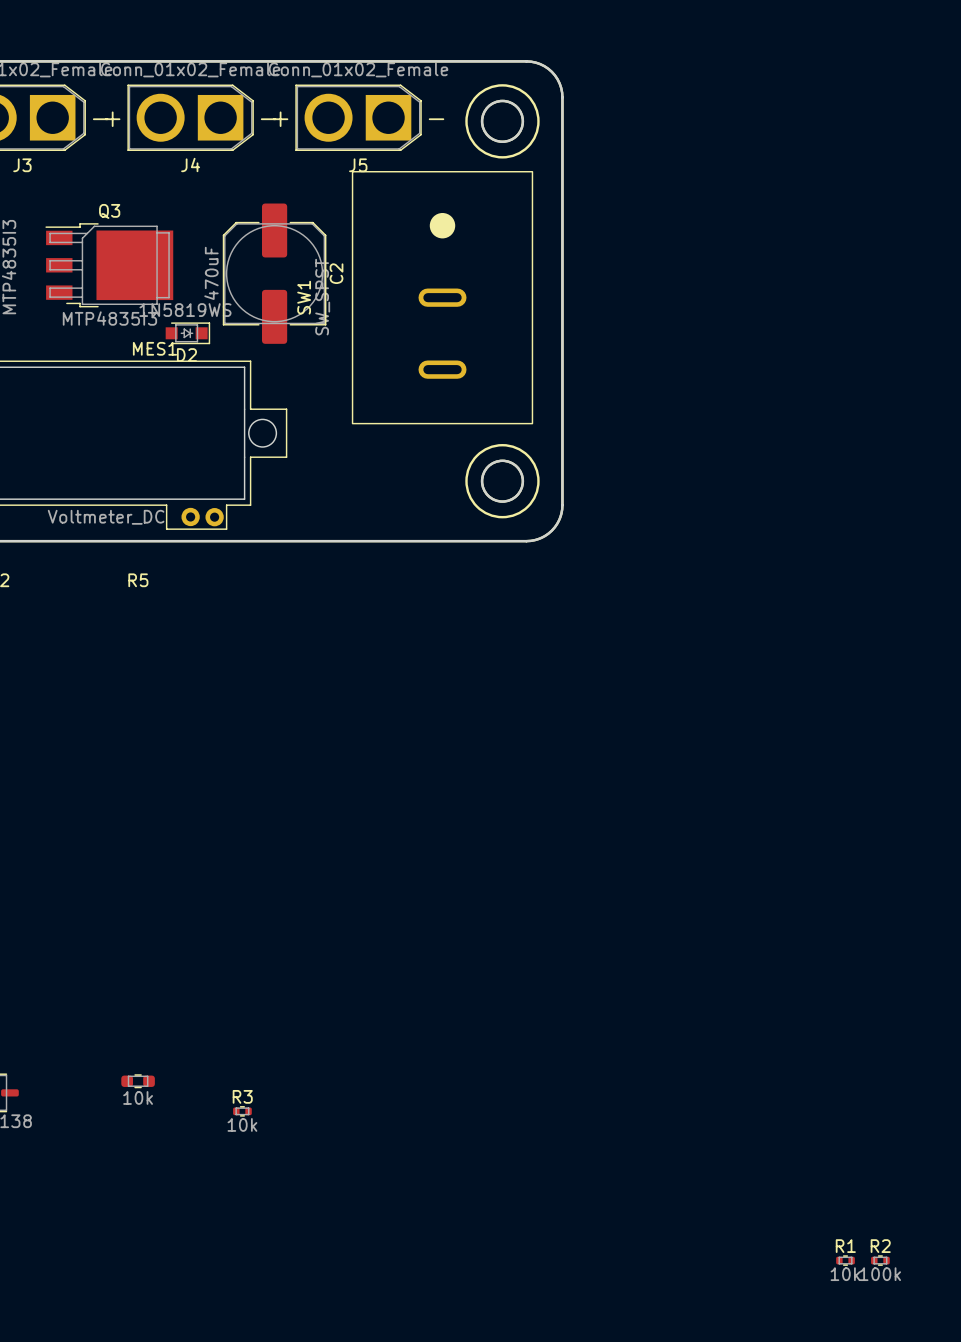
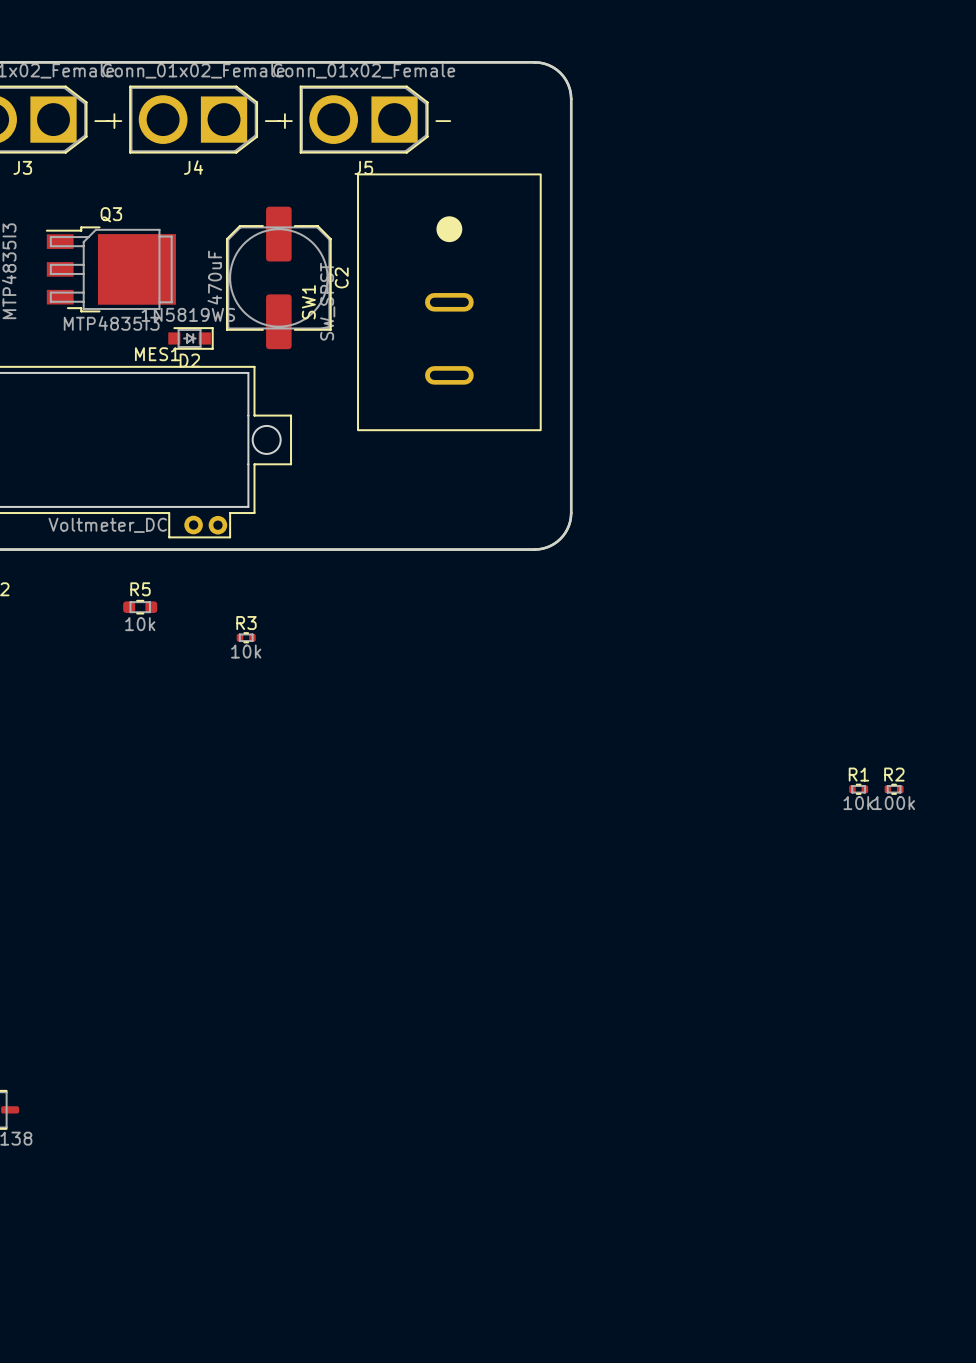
drawing: [465, 84, 540, 159] -> none
round board edge: [480, 99, 525, 143] -> none
drawing: [465, 444, 540, 519] -> none
round board edge: [480, 459, 525, 503] -> none
R5 position: (138, 1081) -> (140, 607)
R3 position: (242, 1111) -> (246, 637)
R1 position: (845, 1260) -> (858, 789)
R2 position: (880, 1260) -> (894, 789)

